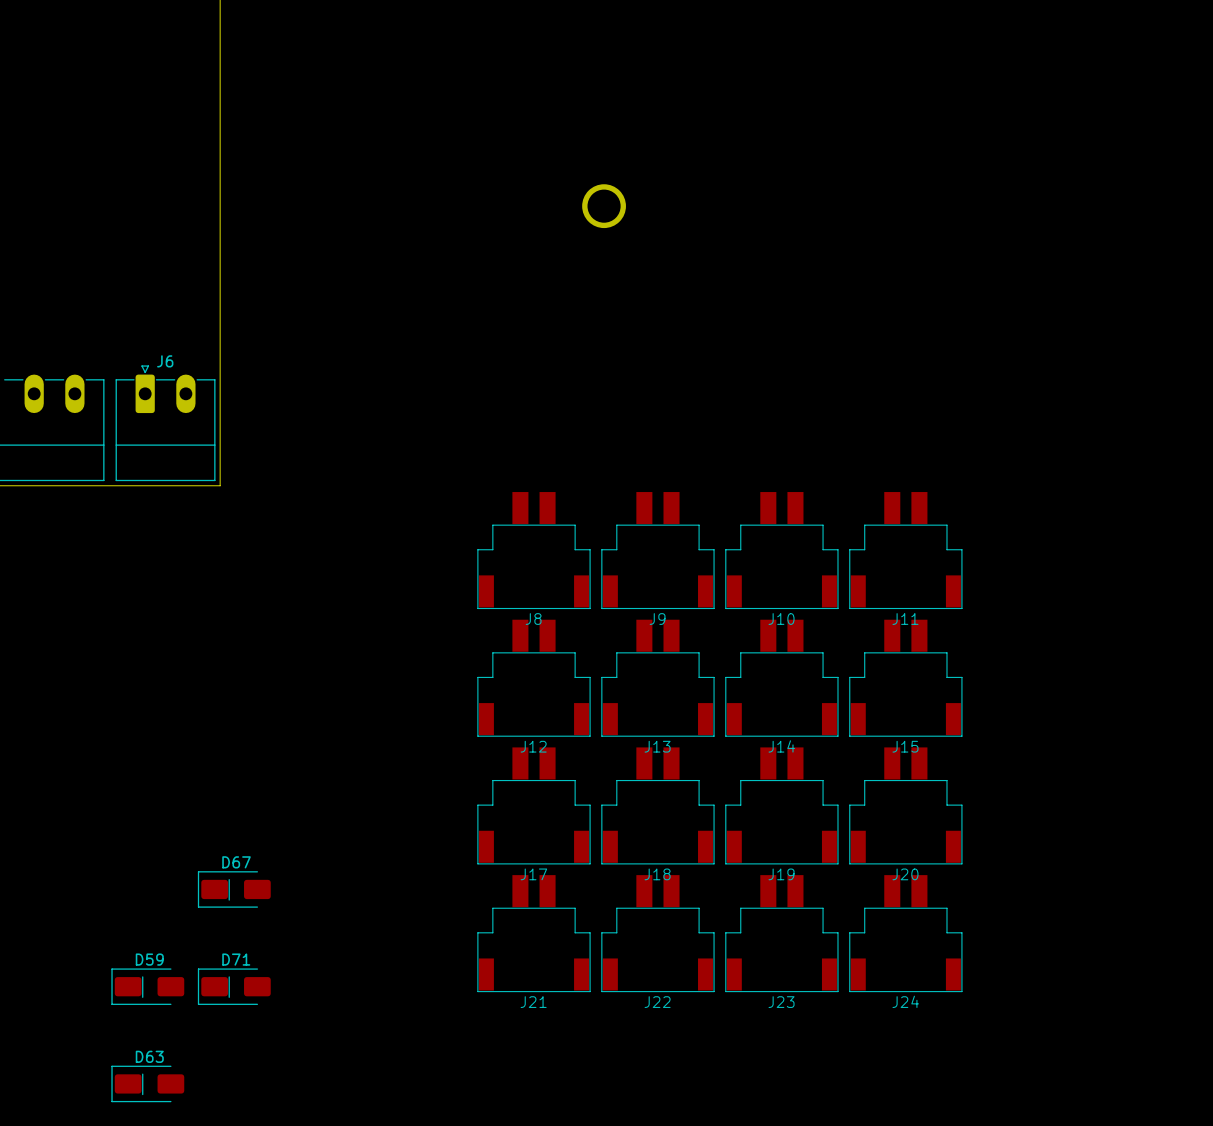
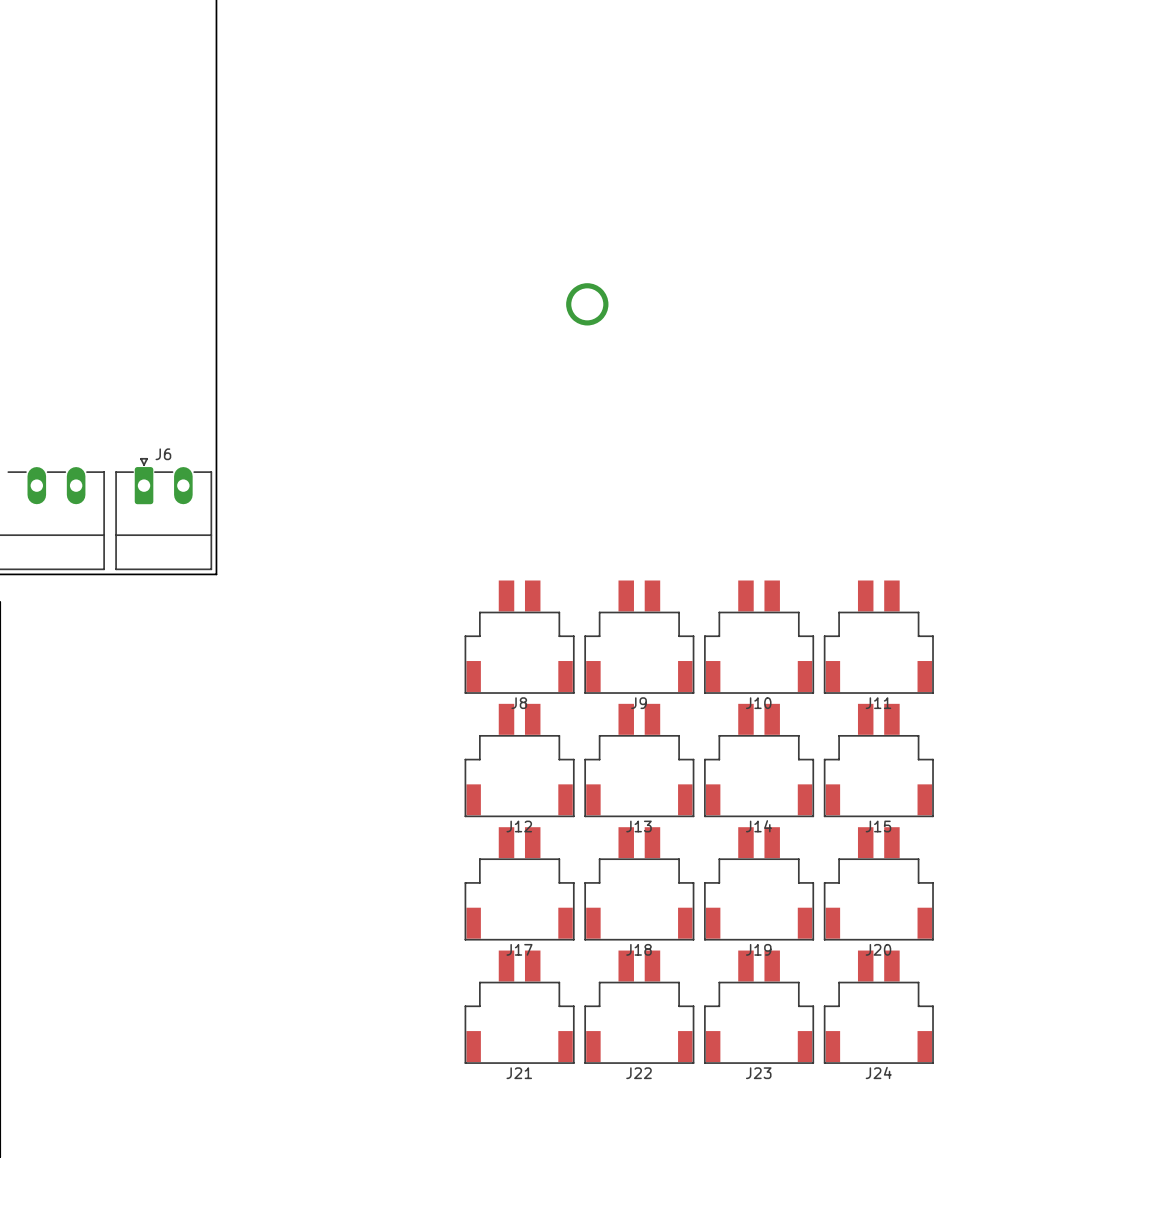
D67: (234, 889) -> none
D59: (147, 986) -> none
D71: (234, 986) -> none
D63: (147, 1083) -> none

